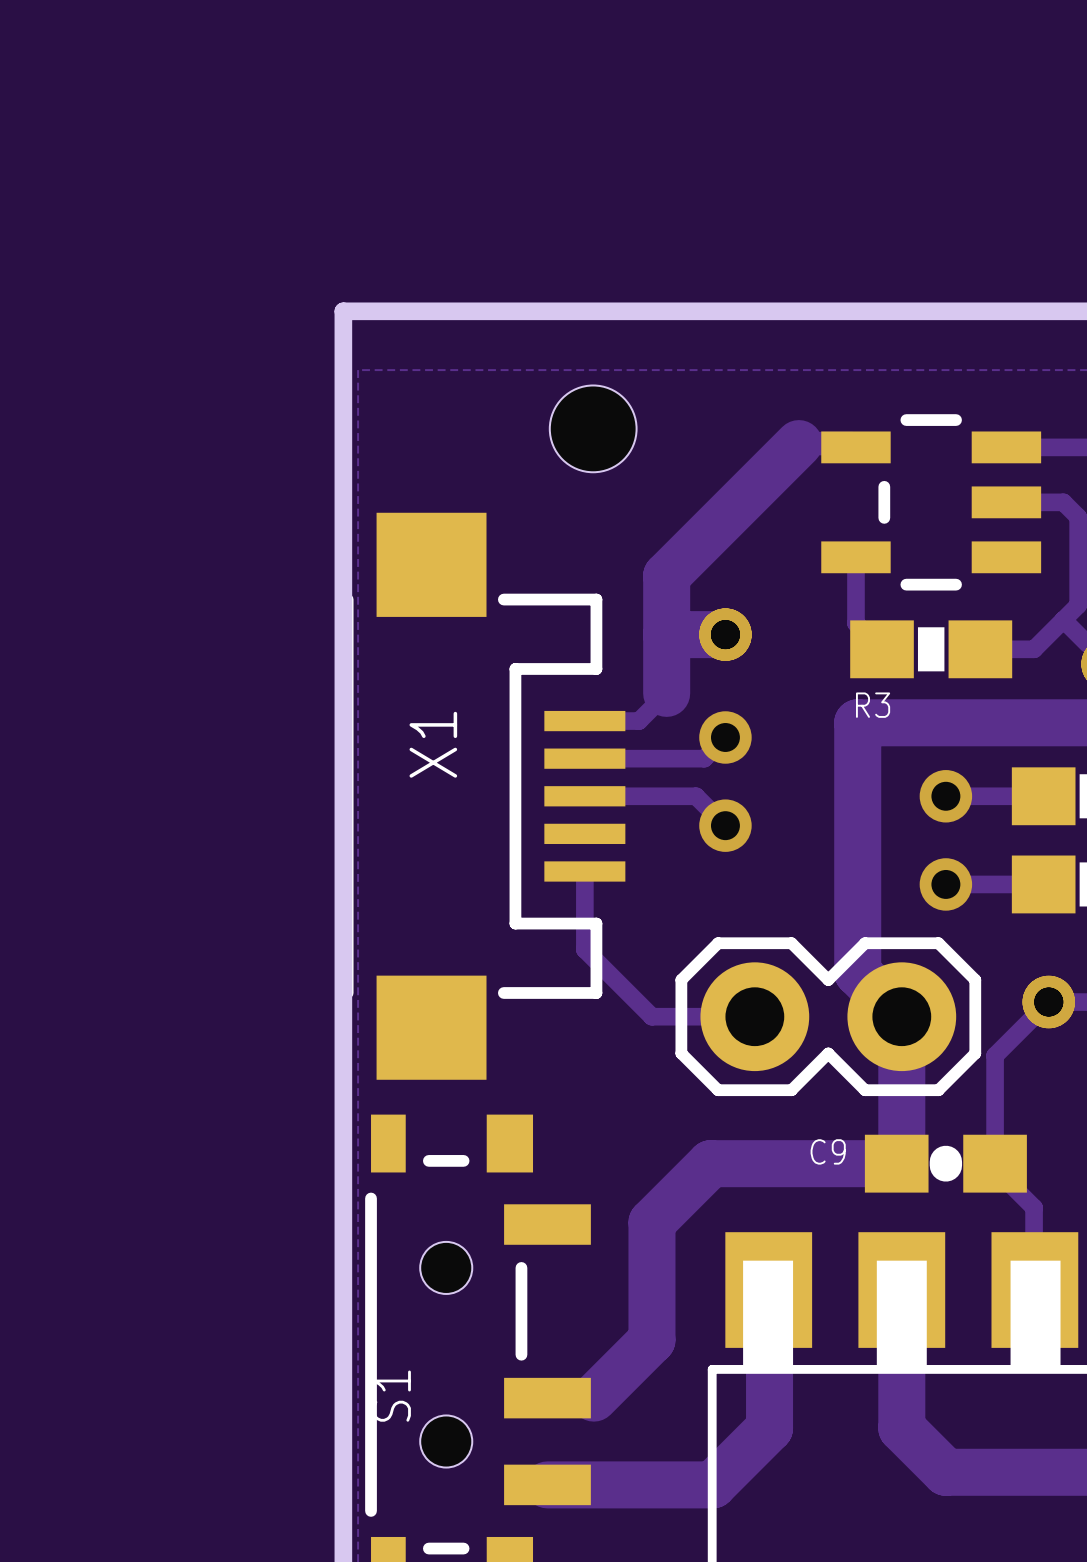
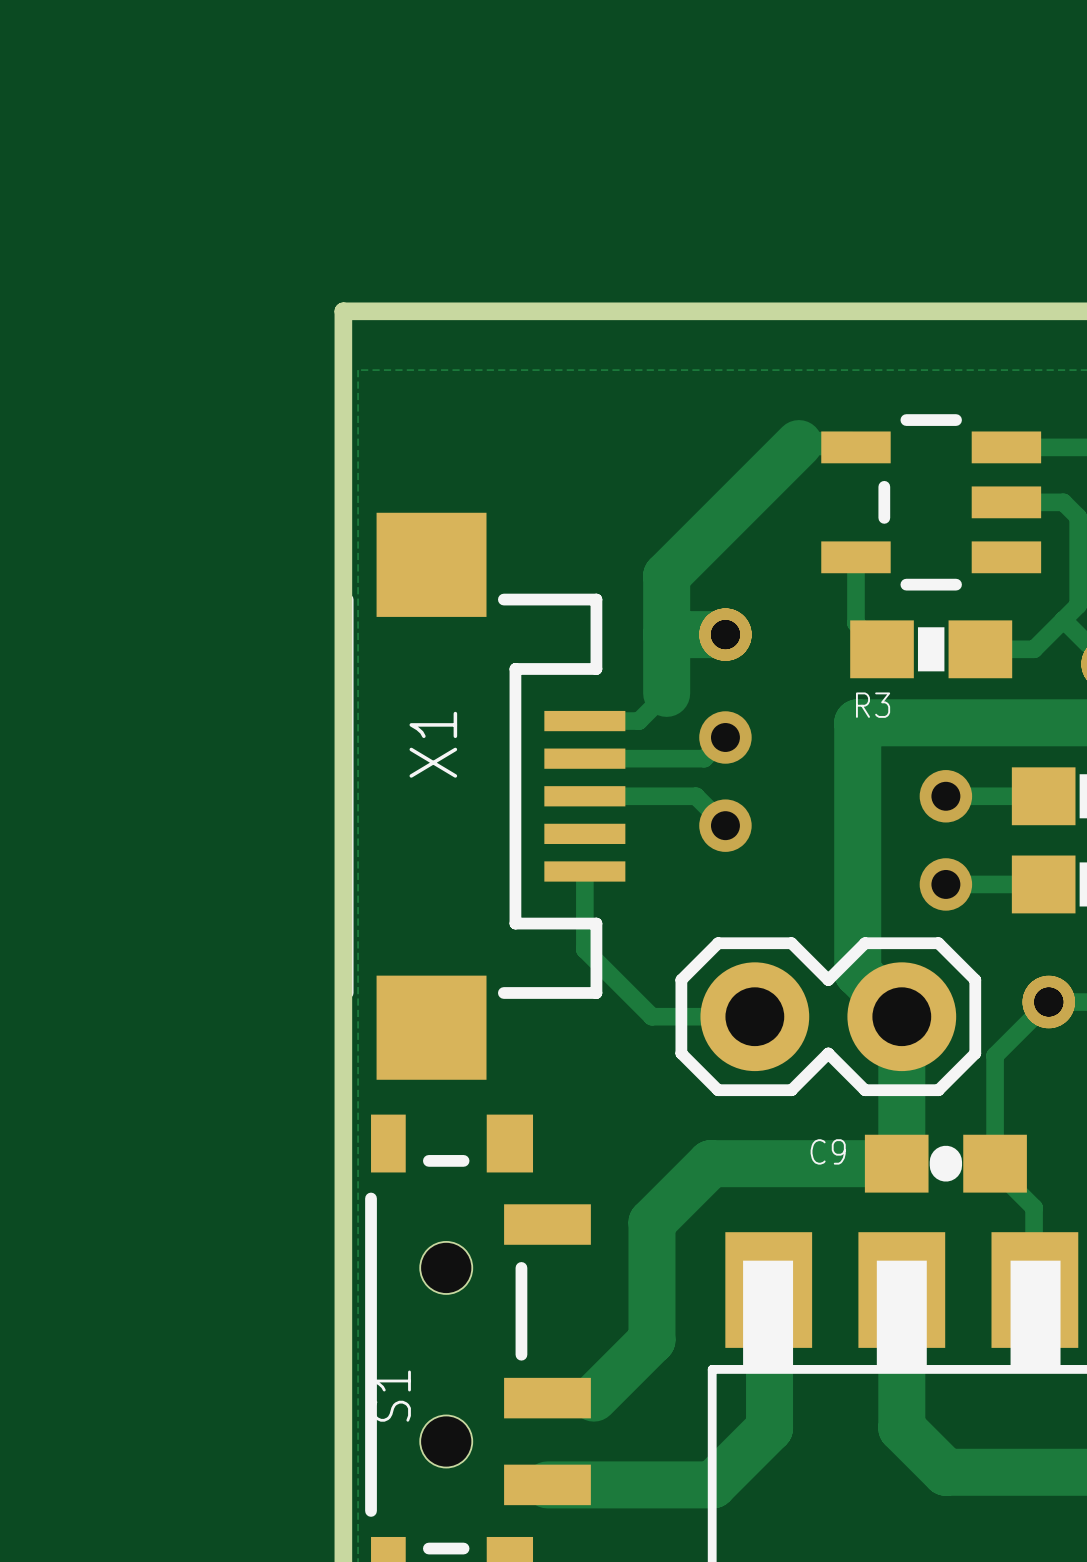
hole: (593, 428) -> none

